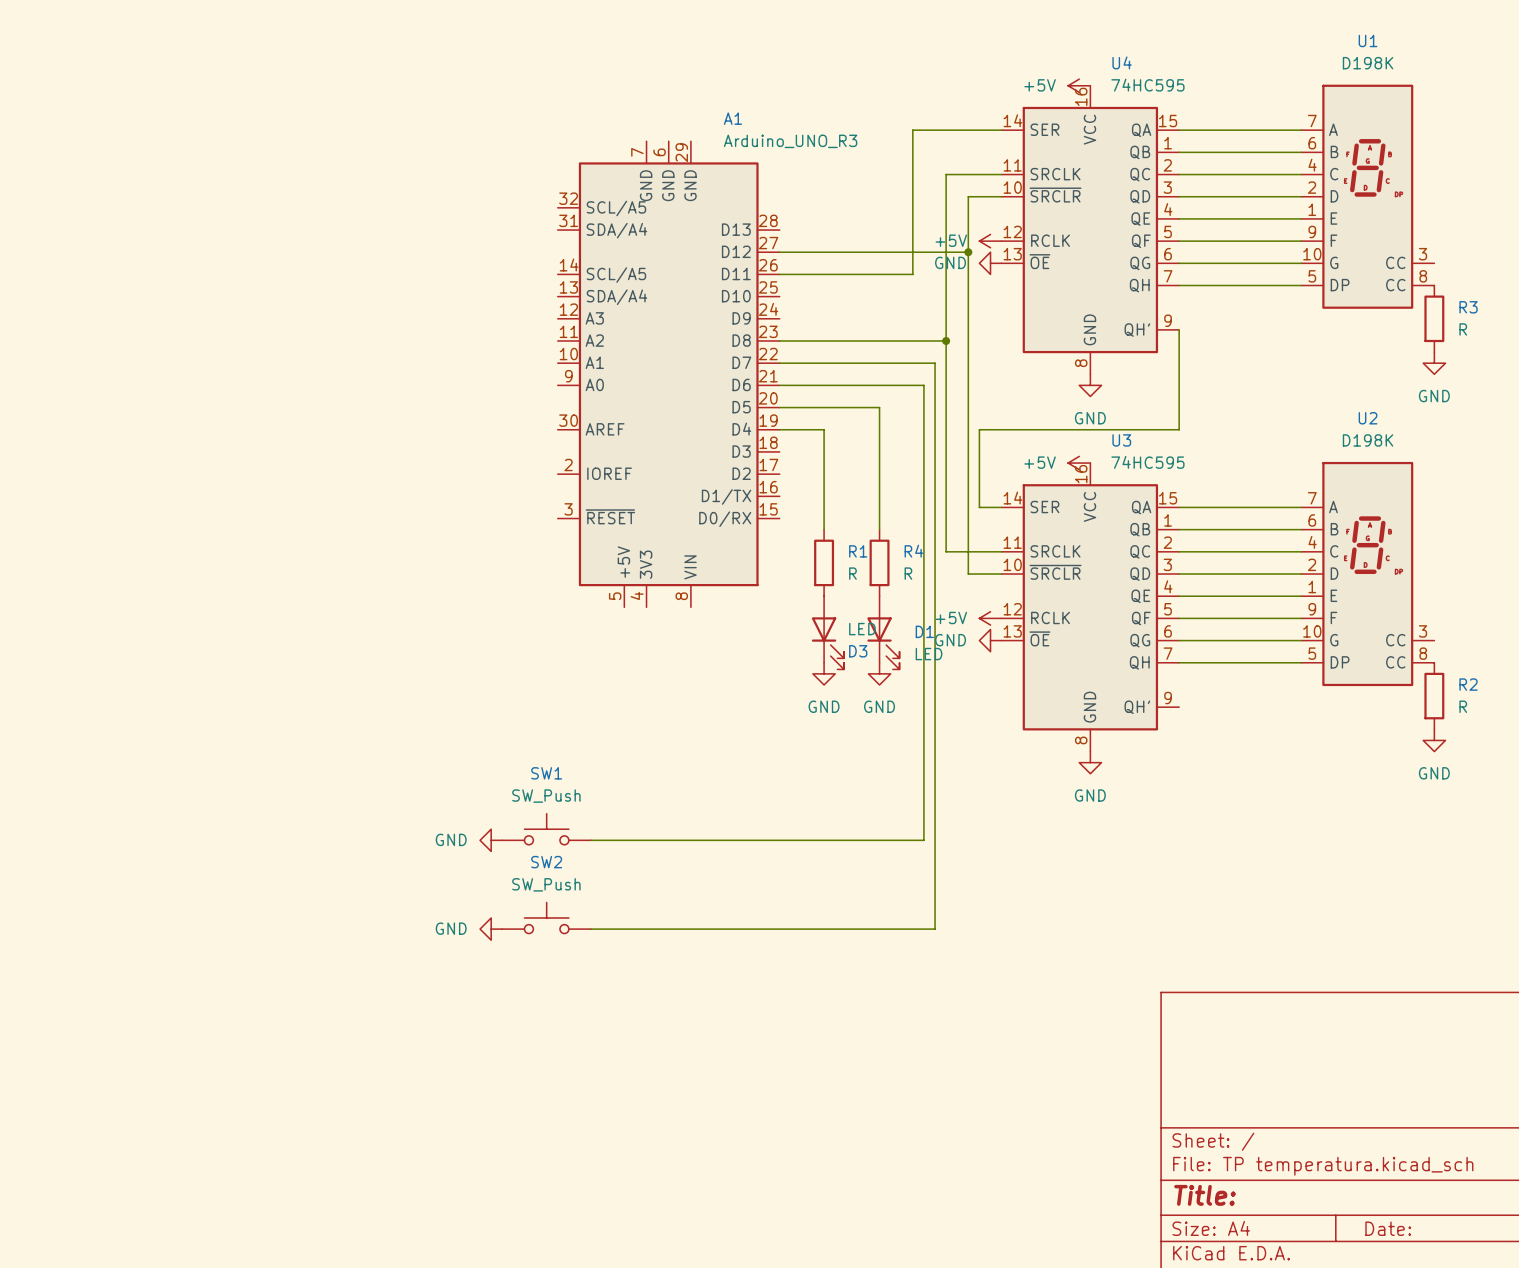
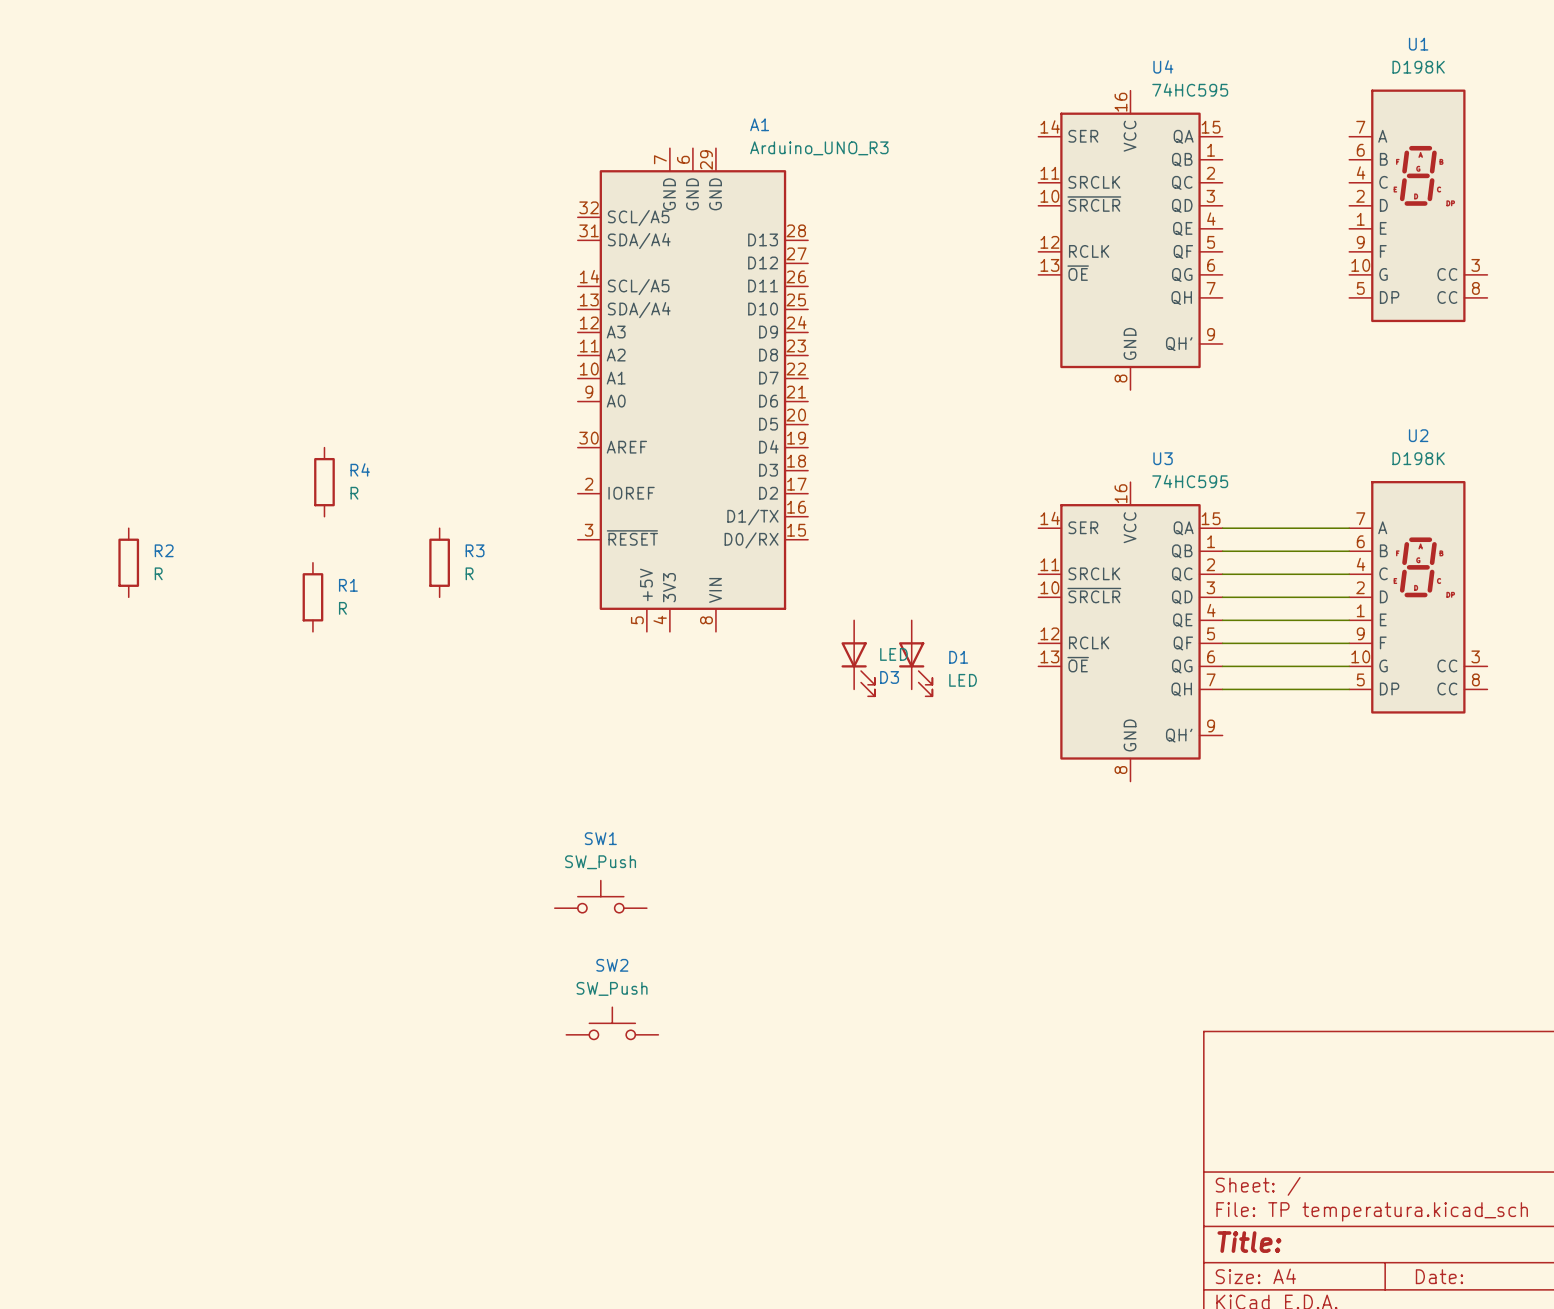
power symbol: +5V (1079, 85) -> none
wire: (1001, 130) (912, 130) (912, 274) (779, 274) -> none
wire: (1179, 130) (1301, 130) -> none
wire: (1179, 152) (1301, 152) -> none
wire: (1001, 174) (946, 174) (946, 551) (1001, 551) -> none
wire: (1179, 174) (1301, 174) -> none
wire: (1001, 196) (968, 196) (968, 574) (1001, 574) -> none
wire: (1179, 196) (1301, 196) -> none
wire: (1179, 218) (1301, 218) -> none
power symbol: +5V (990, 241) -> none
wire: (1179, 241) (1301, 241) -> none
wire: (779, 252) (968, 252) -> none
junction: (968, 252) -> none
power symbol: GND (990, 263) -> none
wire: (1179, 263) (1301, 263) -> none
wire: (1179, 285) (1301, 285) -> none
R3 position: (1434, 318) -> (439, 562)
wire: (1179, 329) (1179, 429) (979, 429) (979, 507) (1001, 507) -> none
wire: (779, 340) (946, 340) -> none
junction: (946, 340) -> none
wire: (779, 363) (935, 363) (935, 929) (591, 929) -> none
power symbol: GND (1434, 363) -> none
wire: (779, 385) (923, 385) (923, 840) (591, 840) -> none
power symbol: GND (1090, 385) -> none
wire: (779, 407) (879, 407) (879, 529) -> none
wire: (779, 429) (824, 429) (824, 529) -> none
power symbol: +5V (1079, 463) -> none
R1 position: (824, 562) -> (312, 597)
R4 position: (879, 562) -> (324, 482)
power symbol: +5V (990, 618) -> none
power symbol: GND (990, 640) -> none
power symbol: GND (824, 673) -> none
power symbol: GND (879, 673) -> none
R2 position: (1434, 696) -> (128, 562)
power symbol: GND (1434, 740) -> none
power symbol: GND (1090, 762) -> none
SW1 position: (546, 829) -> (600, 896)
power symbol: GND (491, 840) -> none
SW2 position: (546, 918) -> (612, 1023)
power symbol: GND (491, 929) -> none

